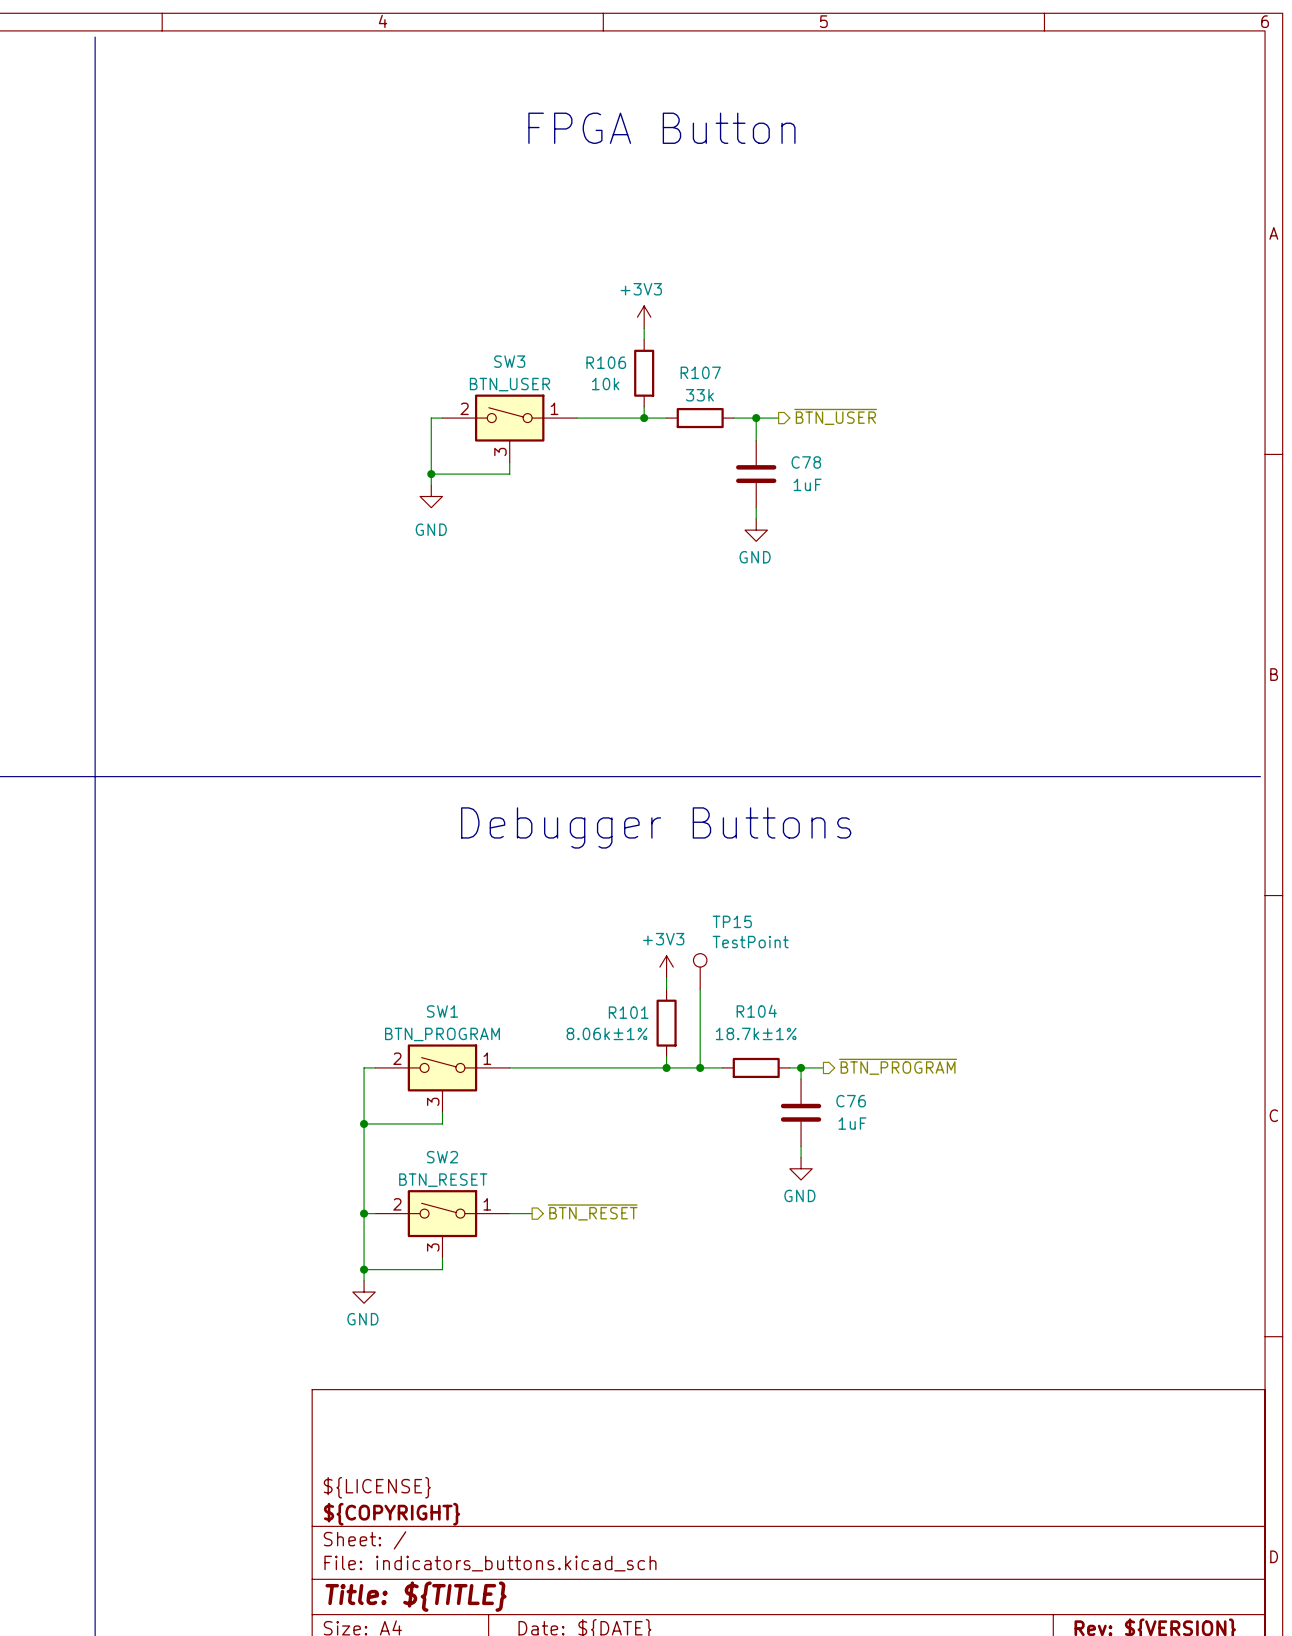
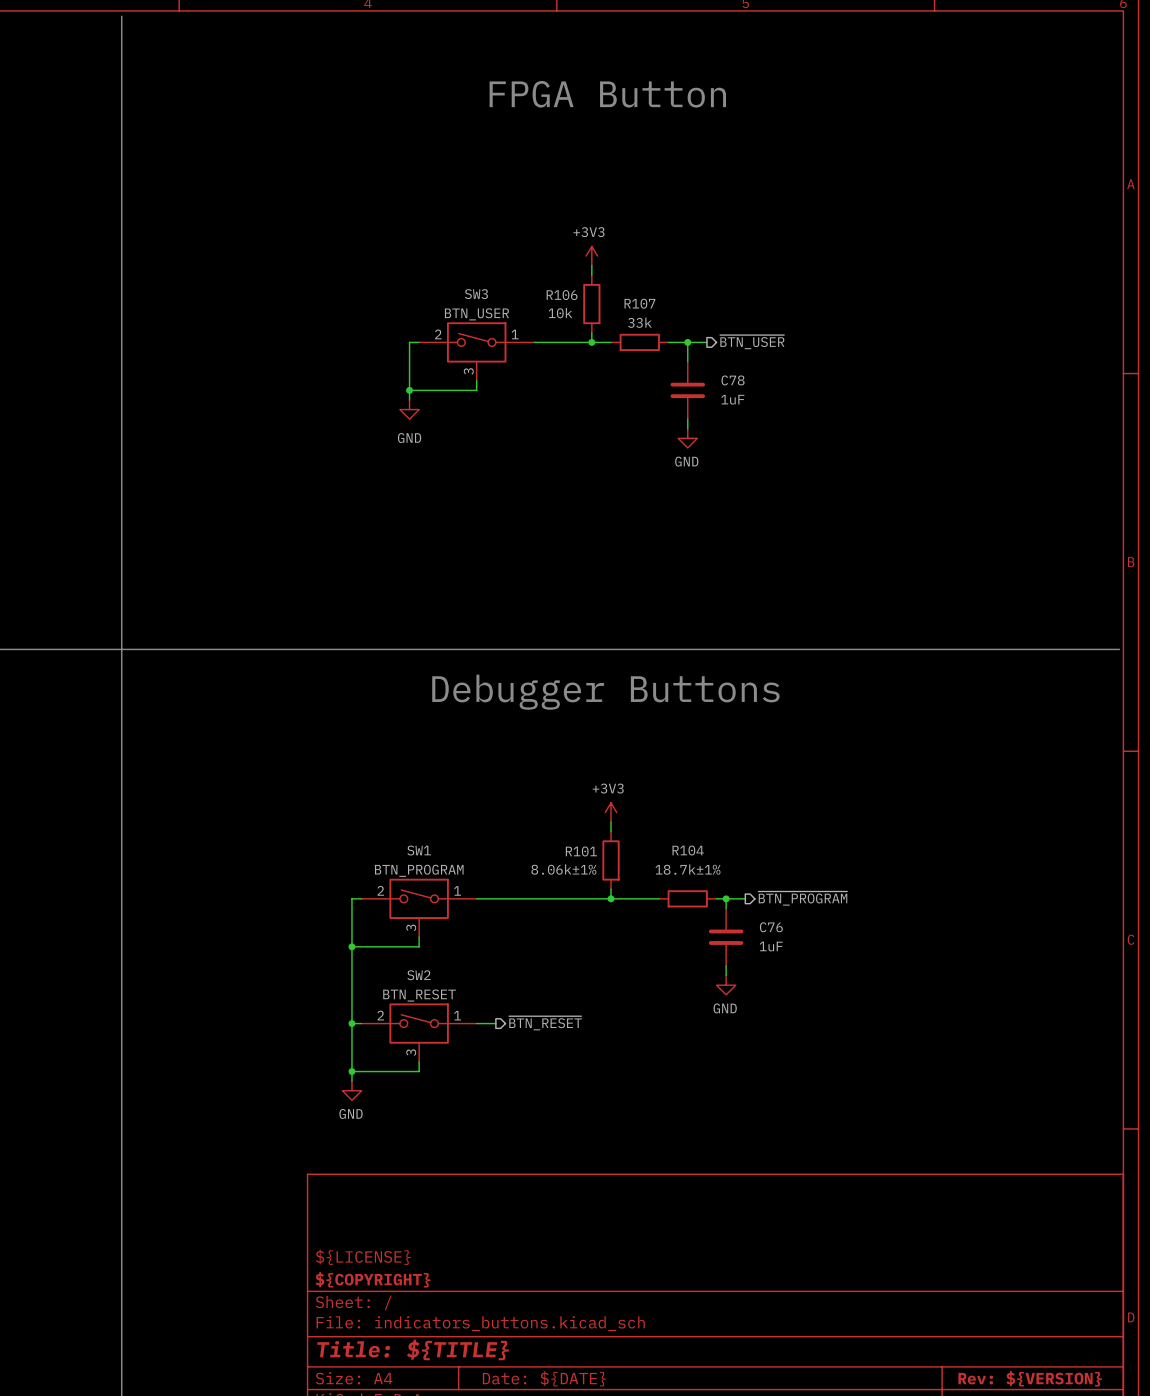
TP15: TestPoint (700, 971) -> none
wire: (700, 989) (700, 1067) -> none
junction: (700, 1067) -> none

